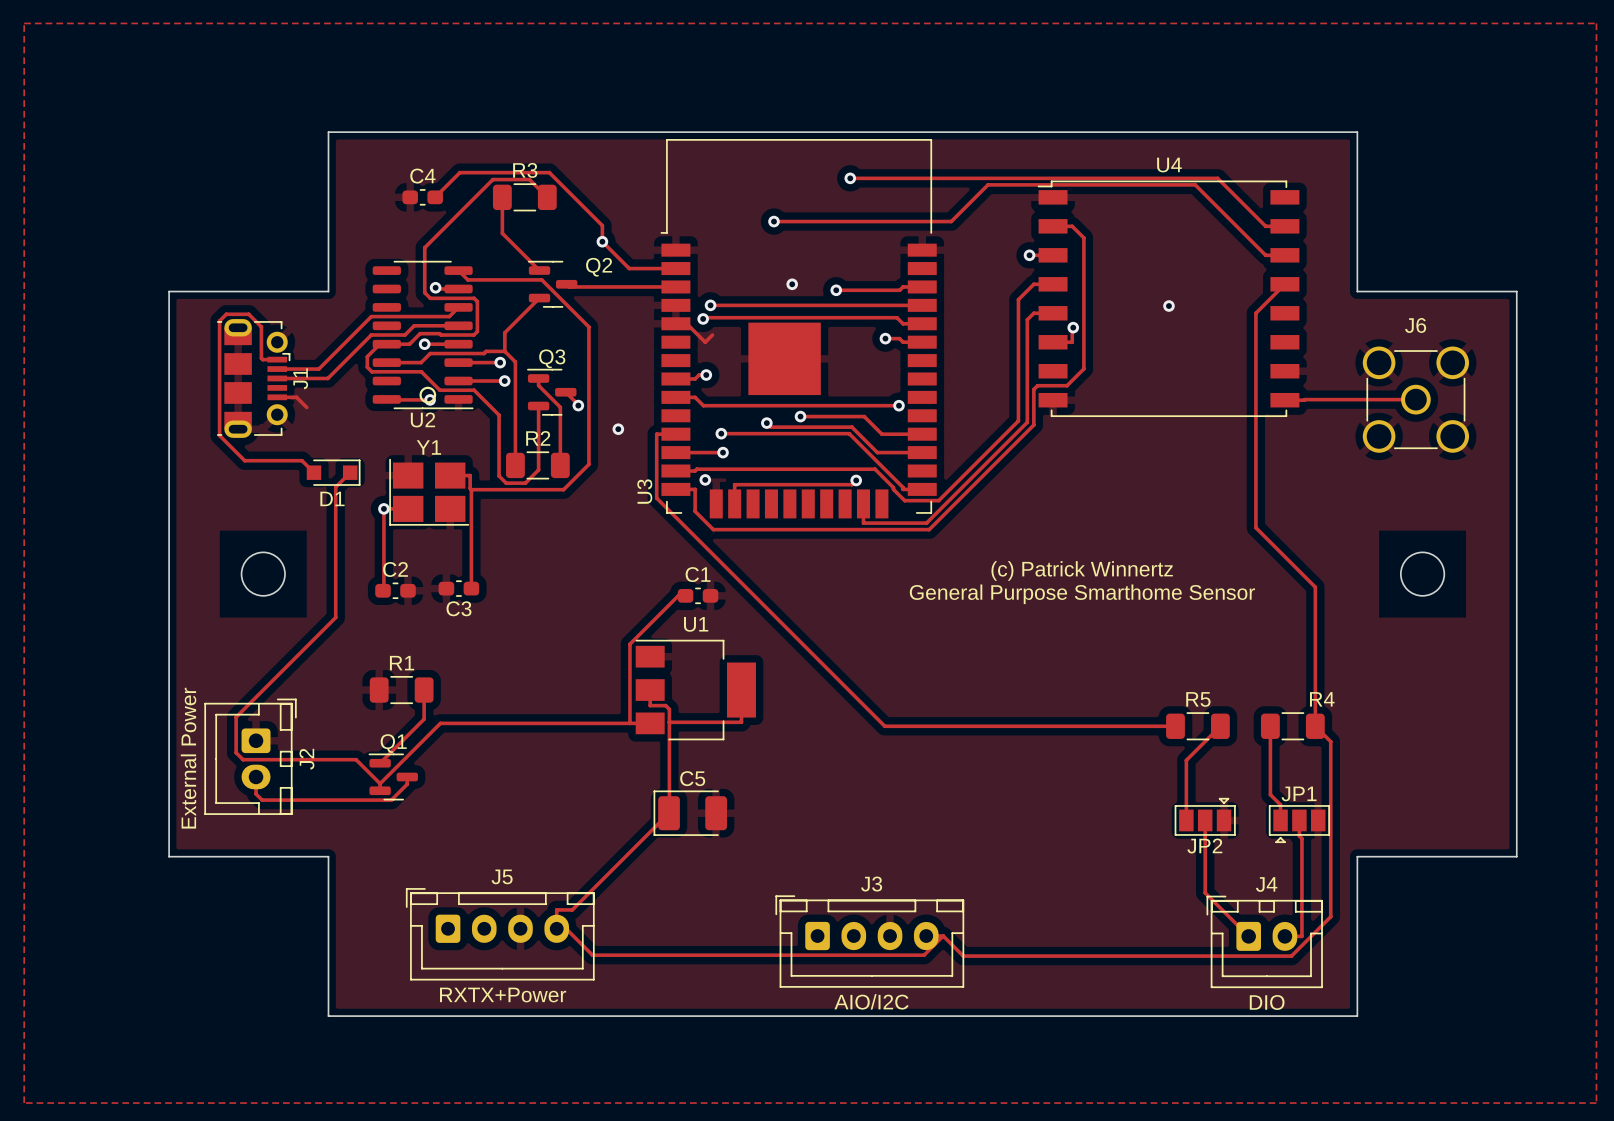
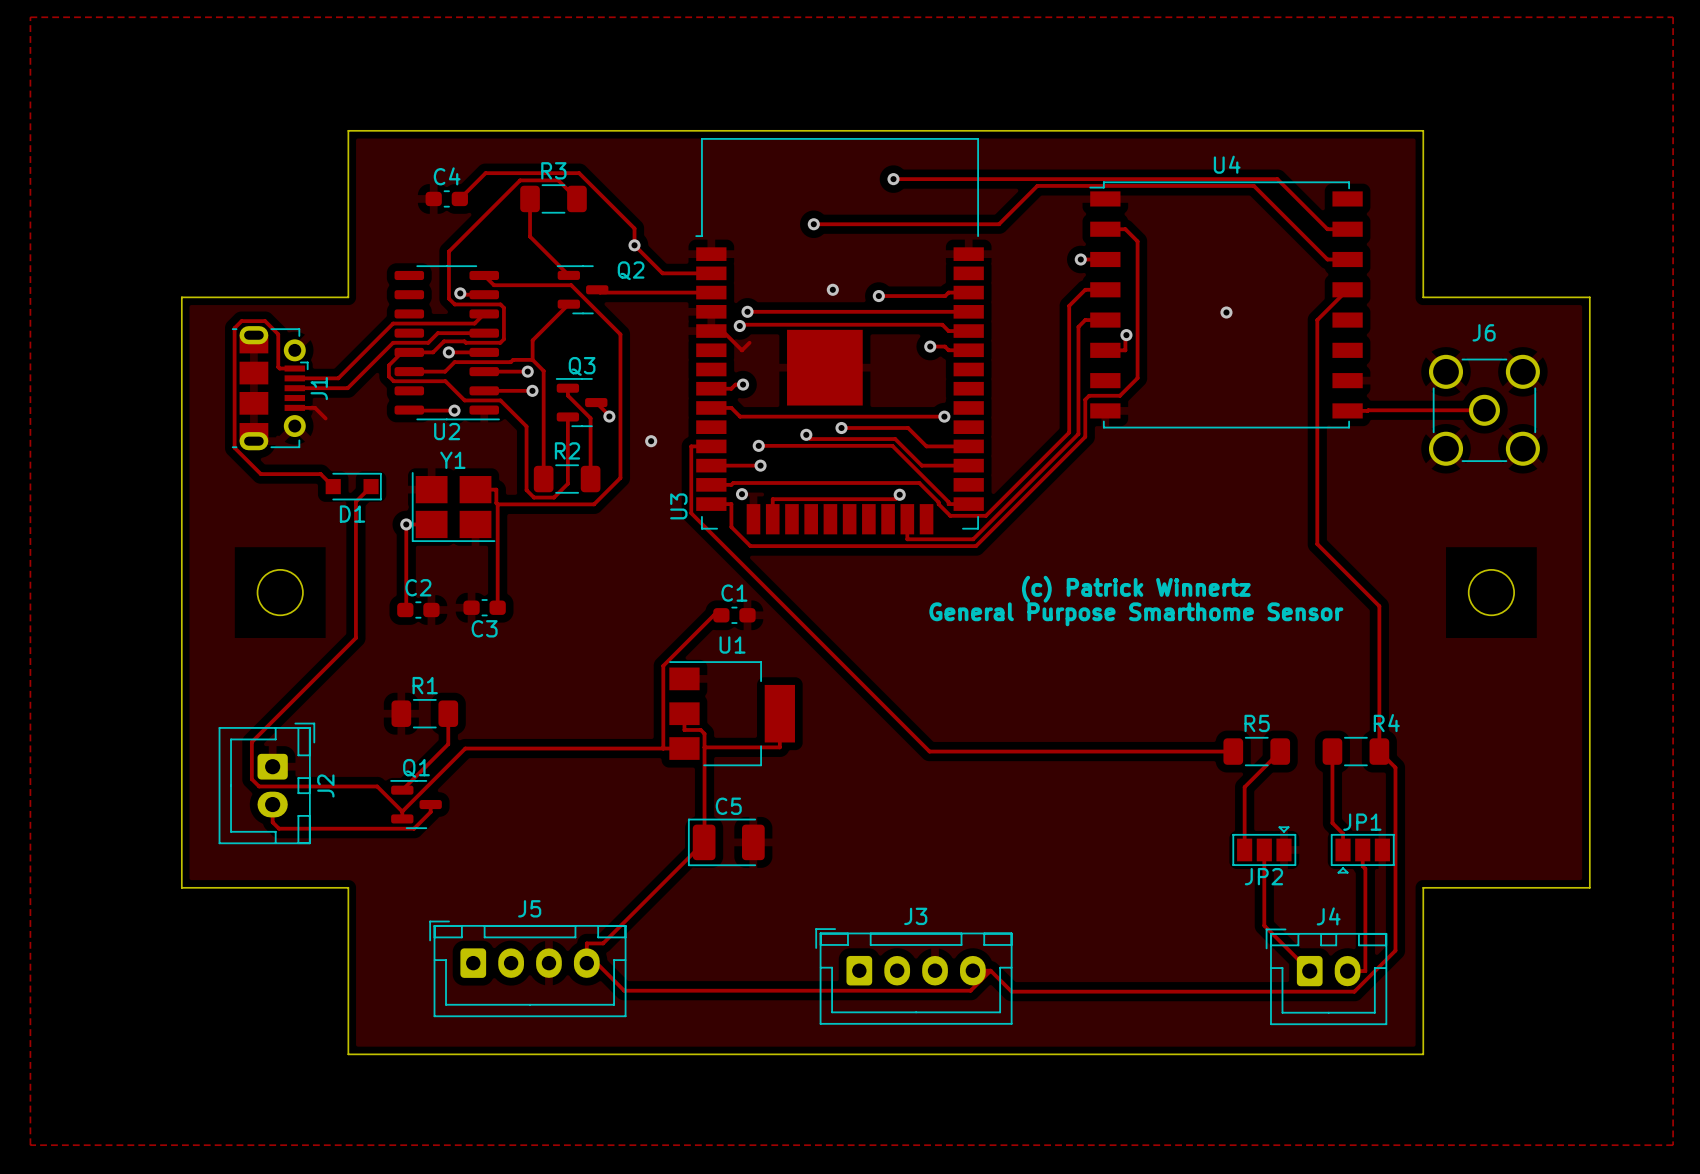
line: (427, 387) (432, 389) (435, 395) (432, 400) (427, 402) (422, 400) (420, 395) (422, 389) (427, 387) -> none
J2 value: External Power (188, 758) -> none
J5 value: RXTX+Power (503, 995) -> none
J3 value: AIO/I2C (871, 1001) -> none
J4 value: DIO (1267, 1002) -> none

